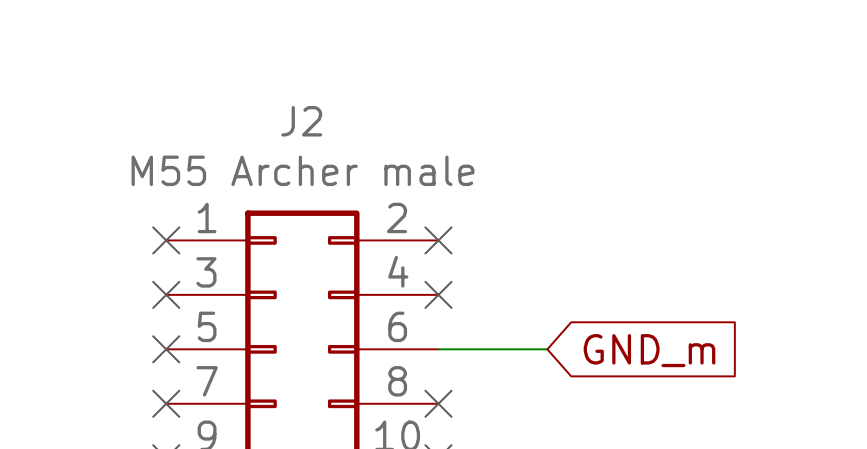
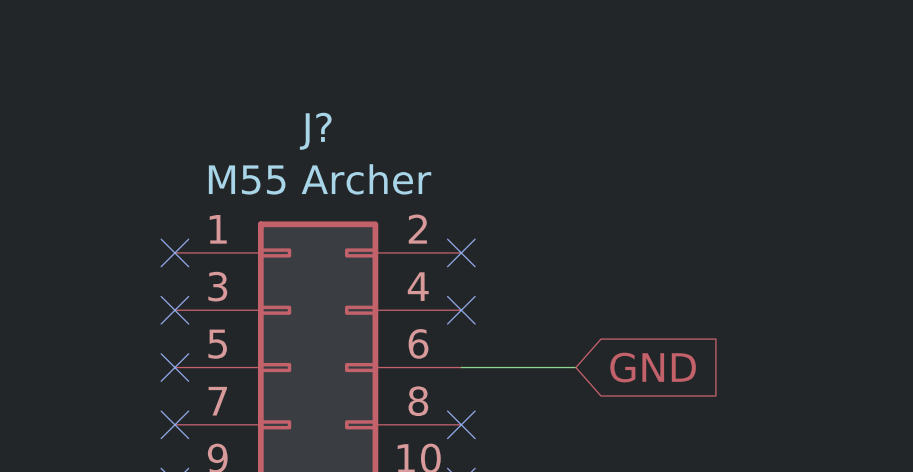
J2 name: J2 (301, 121) -> J? (315, 131)
J2 value: M55 Archer male (303, 170) -> M55 Archer (320, 179)
global label: GND_m (649, 350) -> GND (653, 367)

